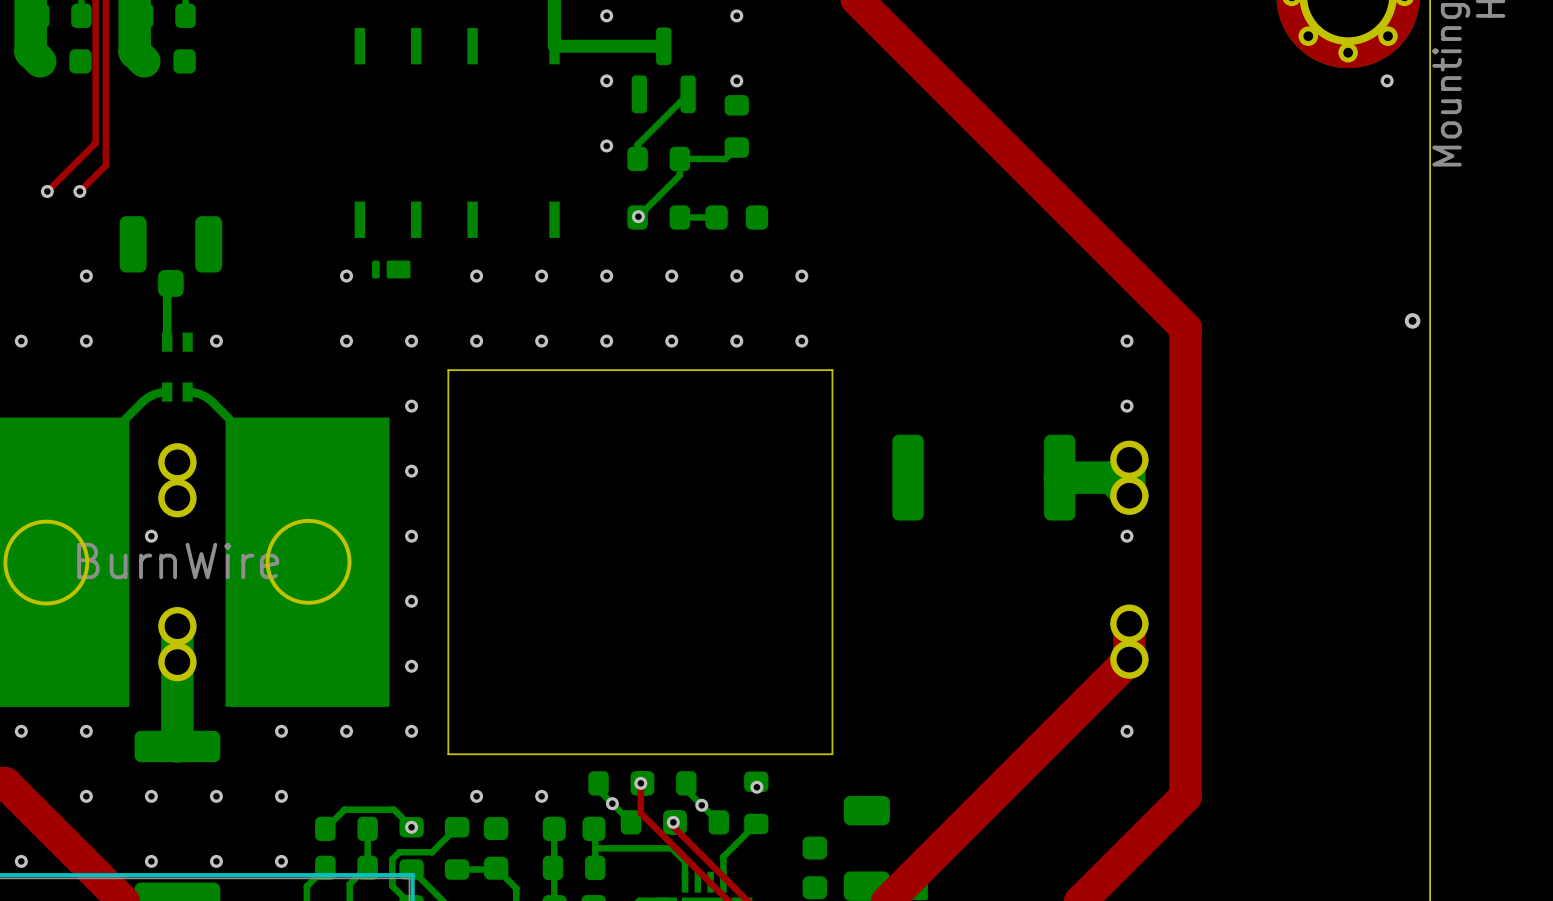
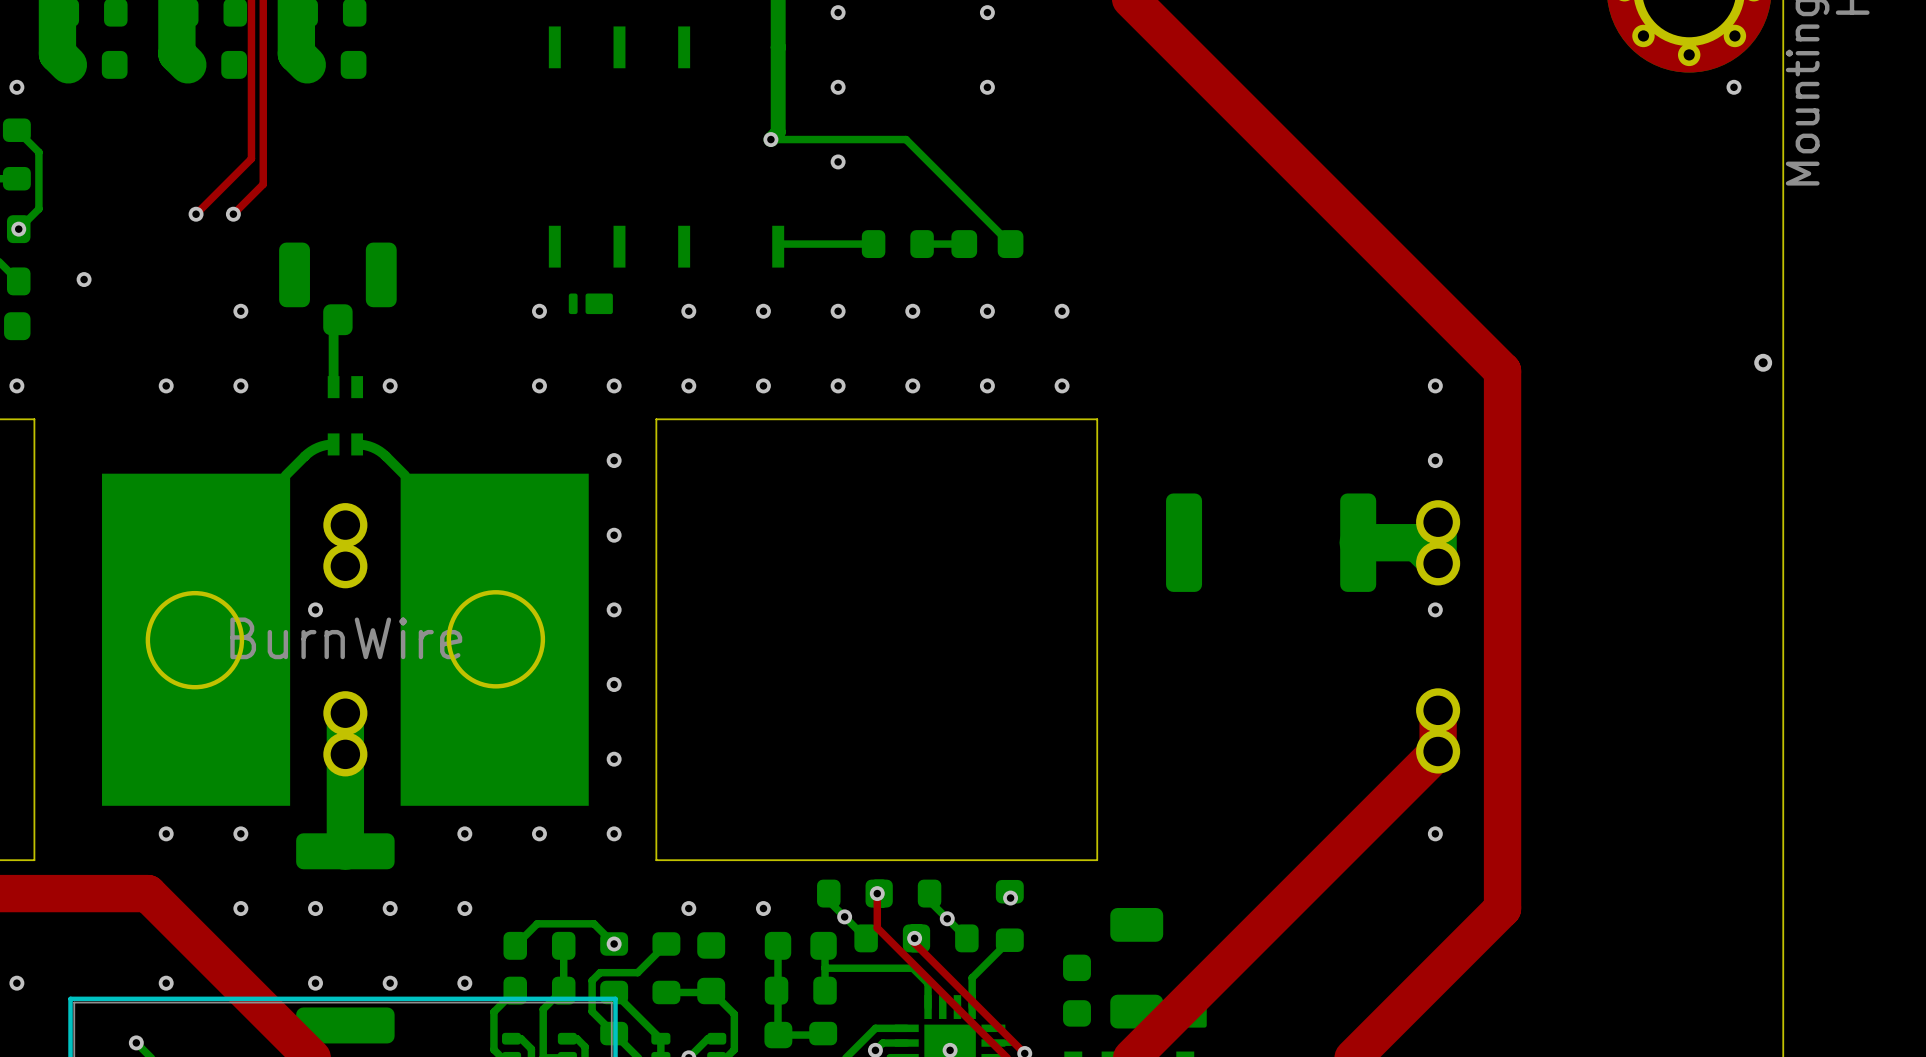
bottom track: (554, 46) (663, 46) -> (778, 47) (778, 132) (770, 139) (906, 139) (1010, 244)
part: (663, 70) -> none
bottom track: (688, 94) (637, 144) (637, 158) -> none
part: (736, 126) -> none
bottom track: (736, 147) (725, 158) (679, 158) (679, 175) (638, 216) -> none
part: (658, 158) -> none
via position: (638, 216) -> (770, 139)
bottom track: none -> (873, 244) (780, 244) (778, 246)

